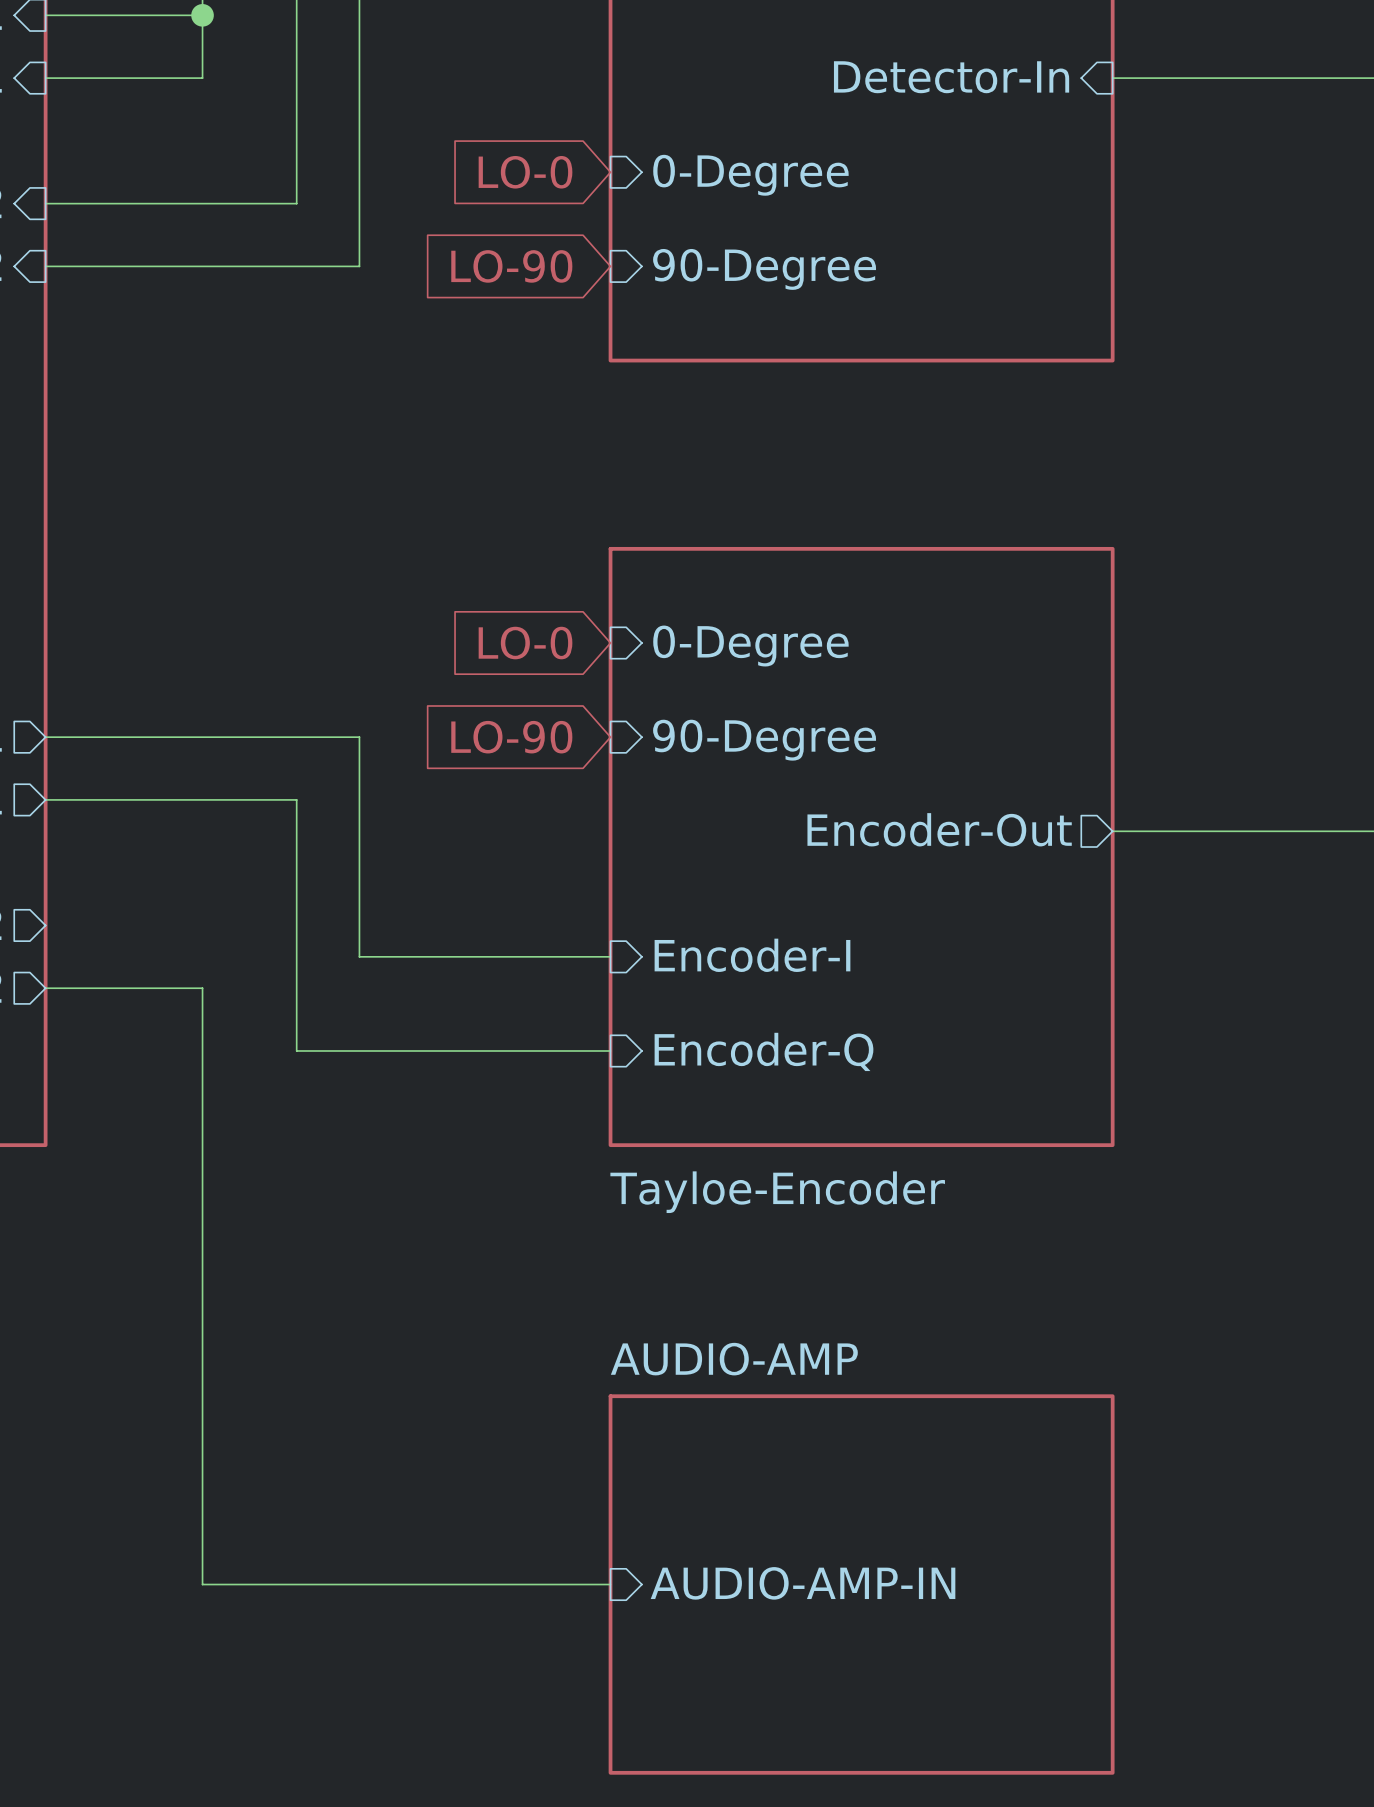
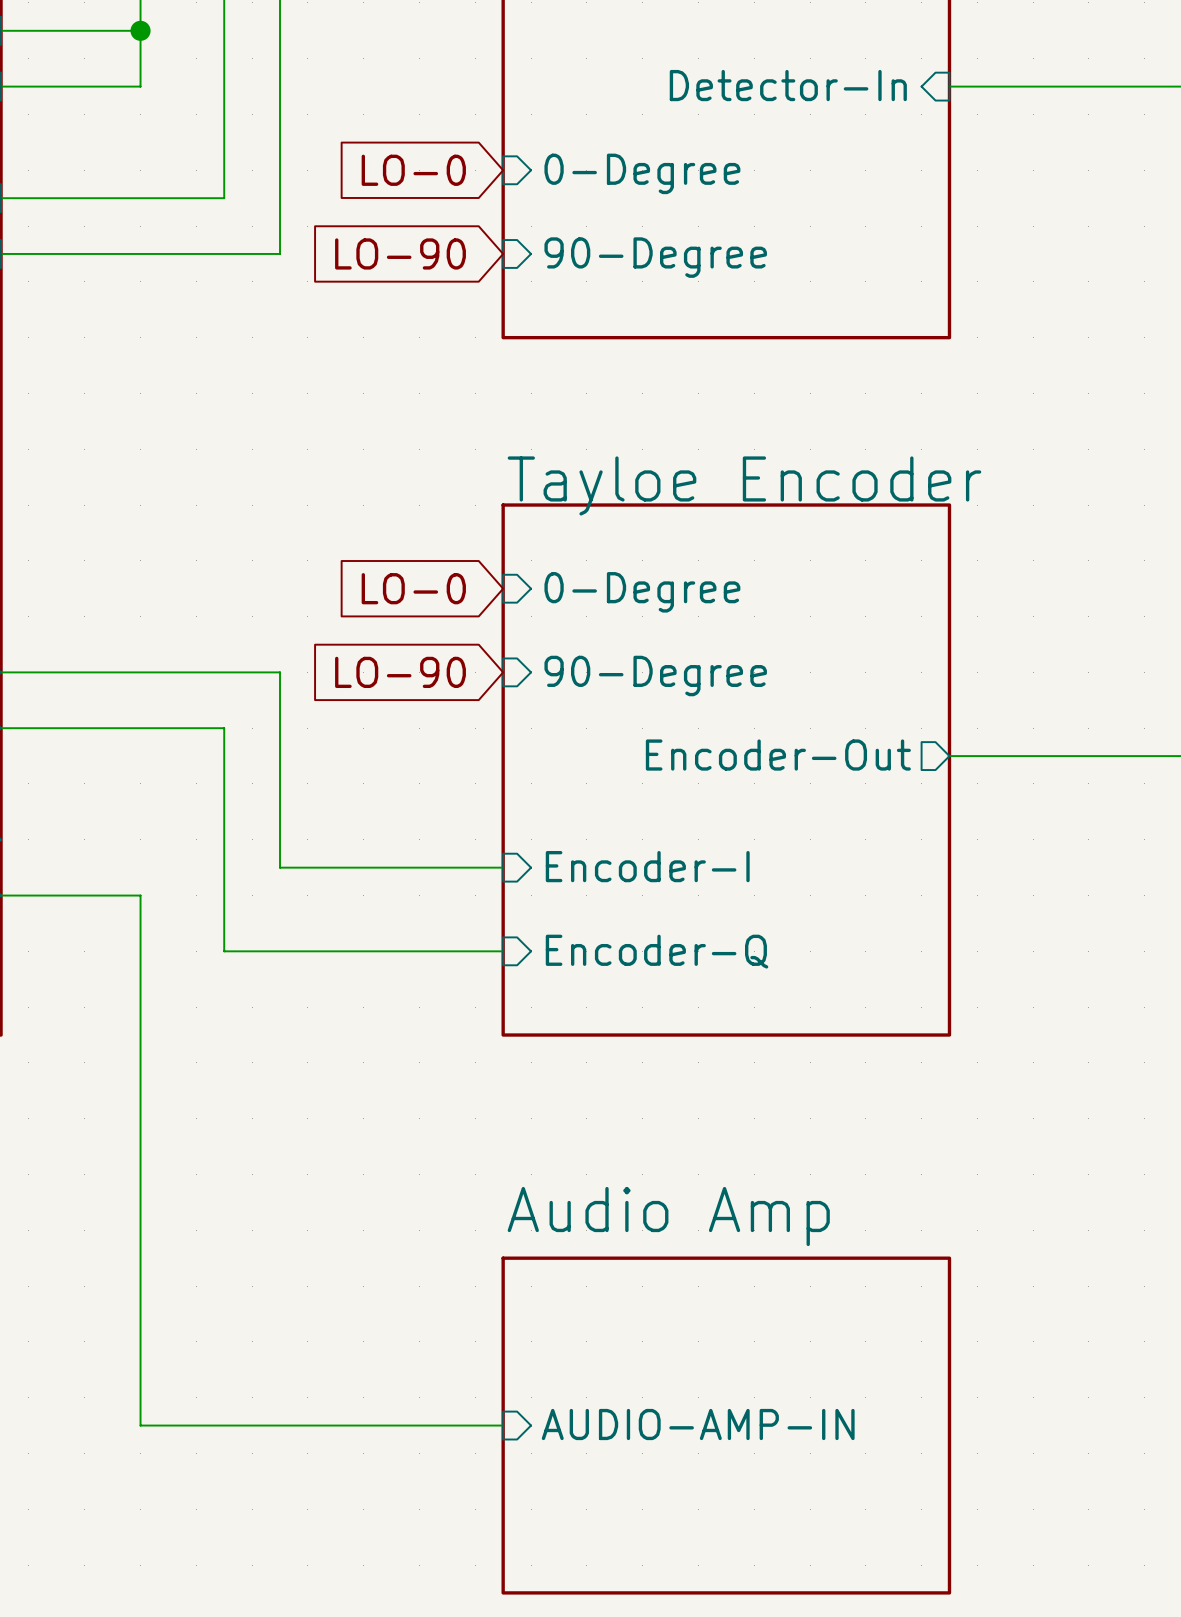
sheet Tayloe-Encoder name: Tayloe-Encoder (777, 1192) -> Tayloe Encoder (744, 485)
sheet AUDIO-AMP name: AUDIO-AMP (734, 1359) -> Audio Amp (668, 1216)

